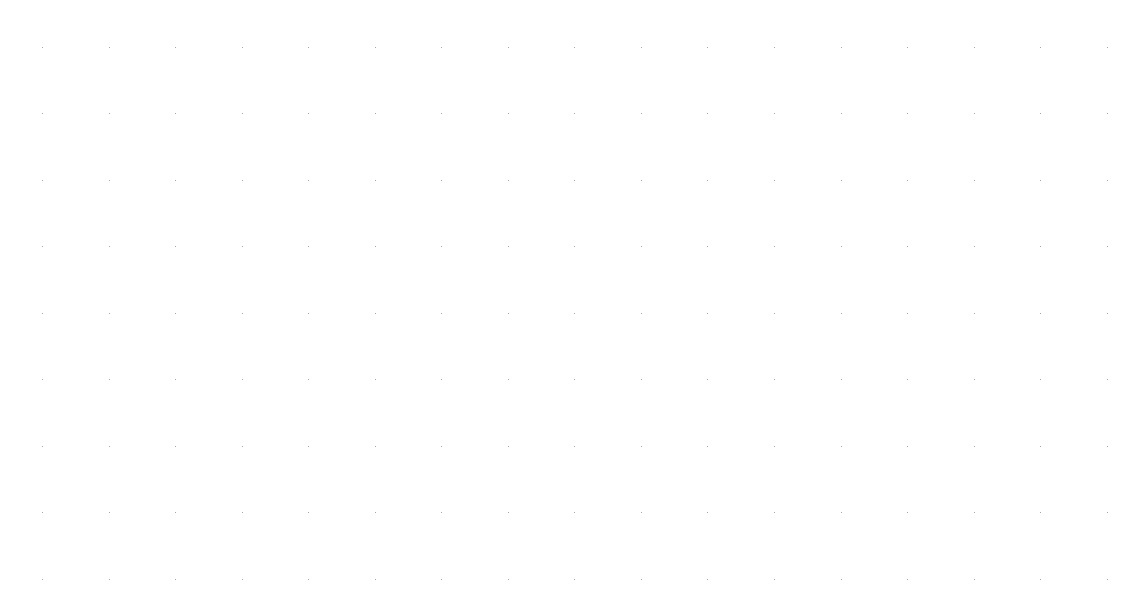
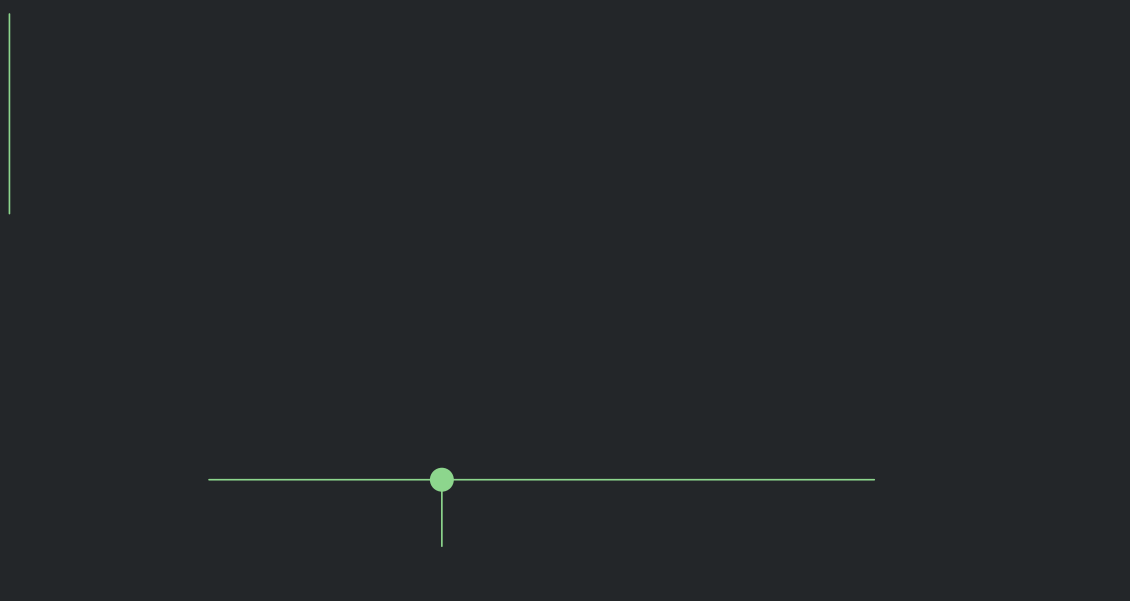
wire: none -> (9, 14) (9, 213)
wire: none -> (209, 479) (874, 479)
wire: none -> (441, 479) (441, 546)
junction: none -> (441, 479)

